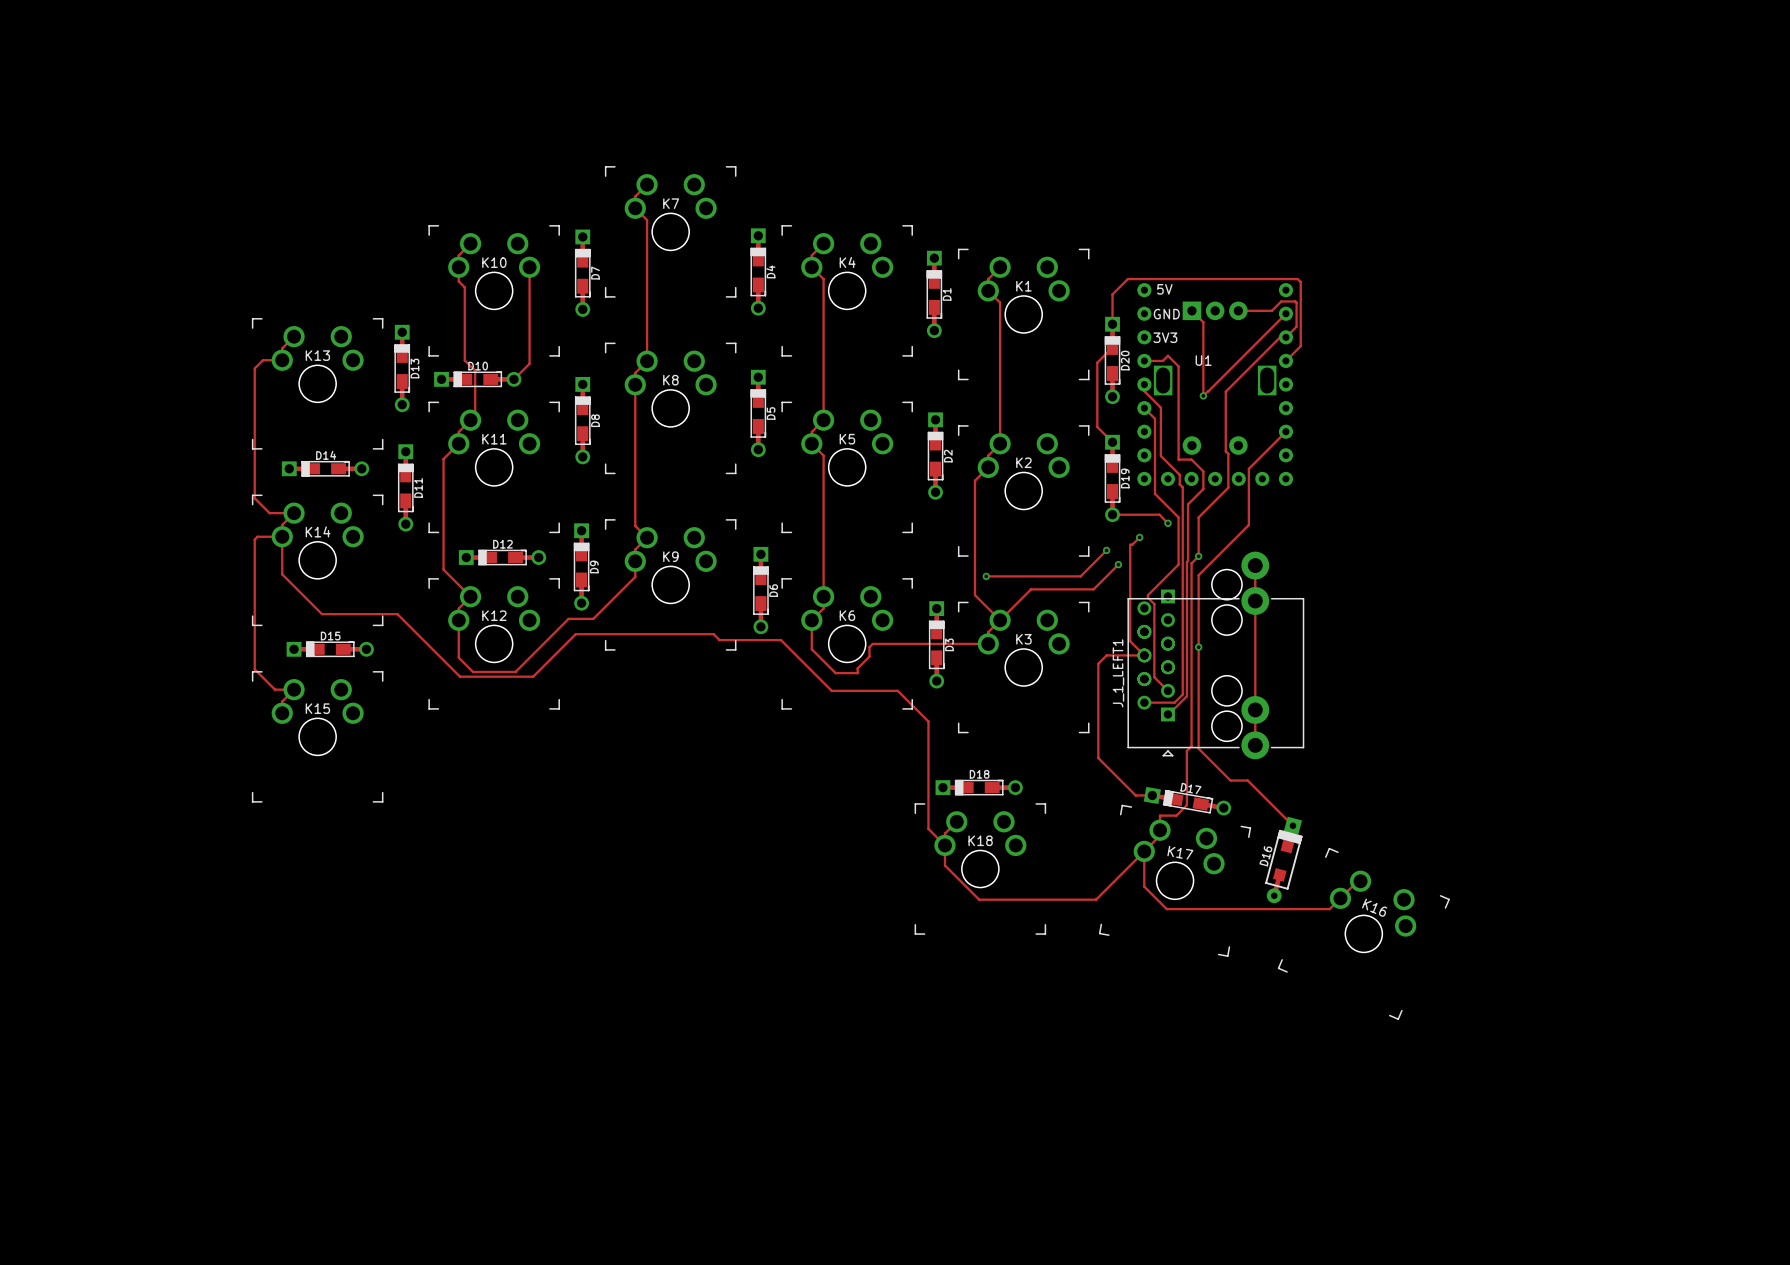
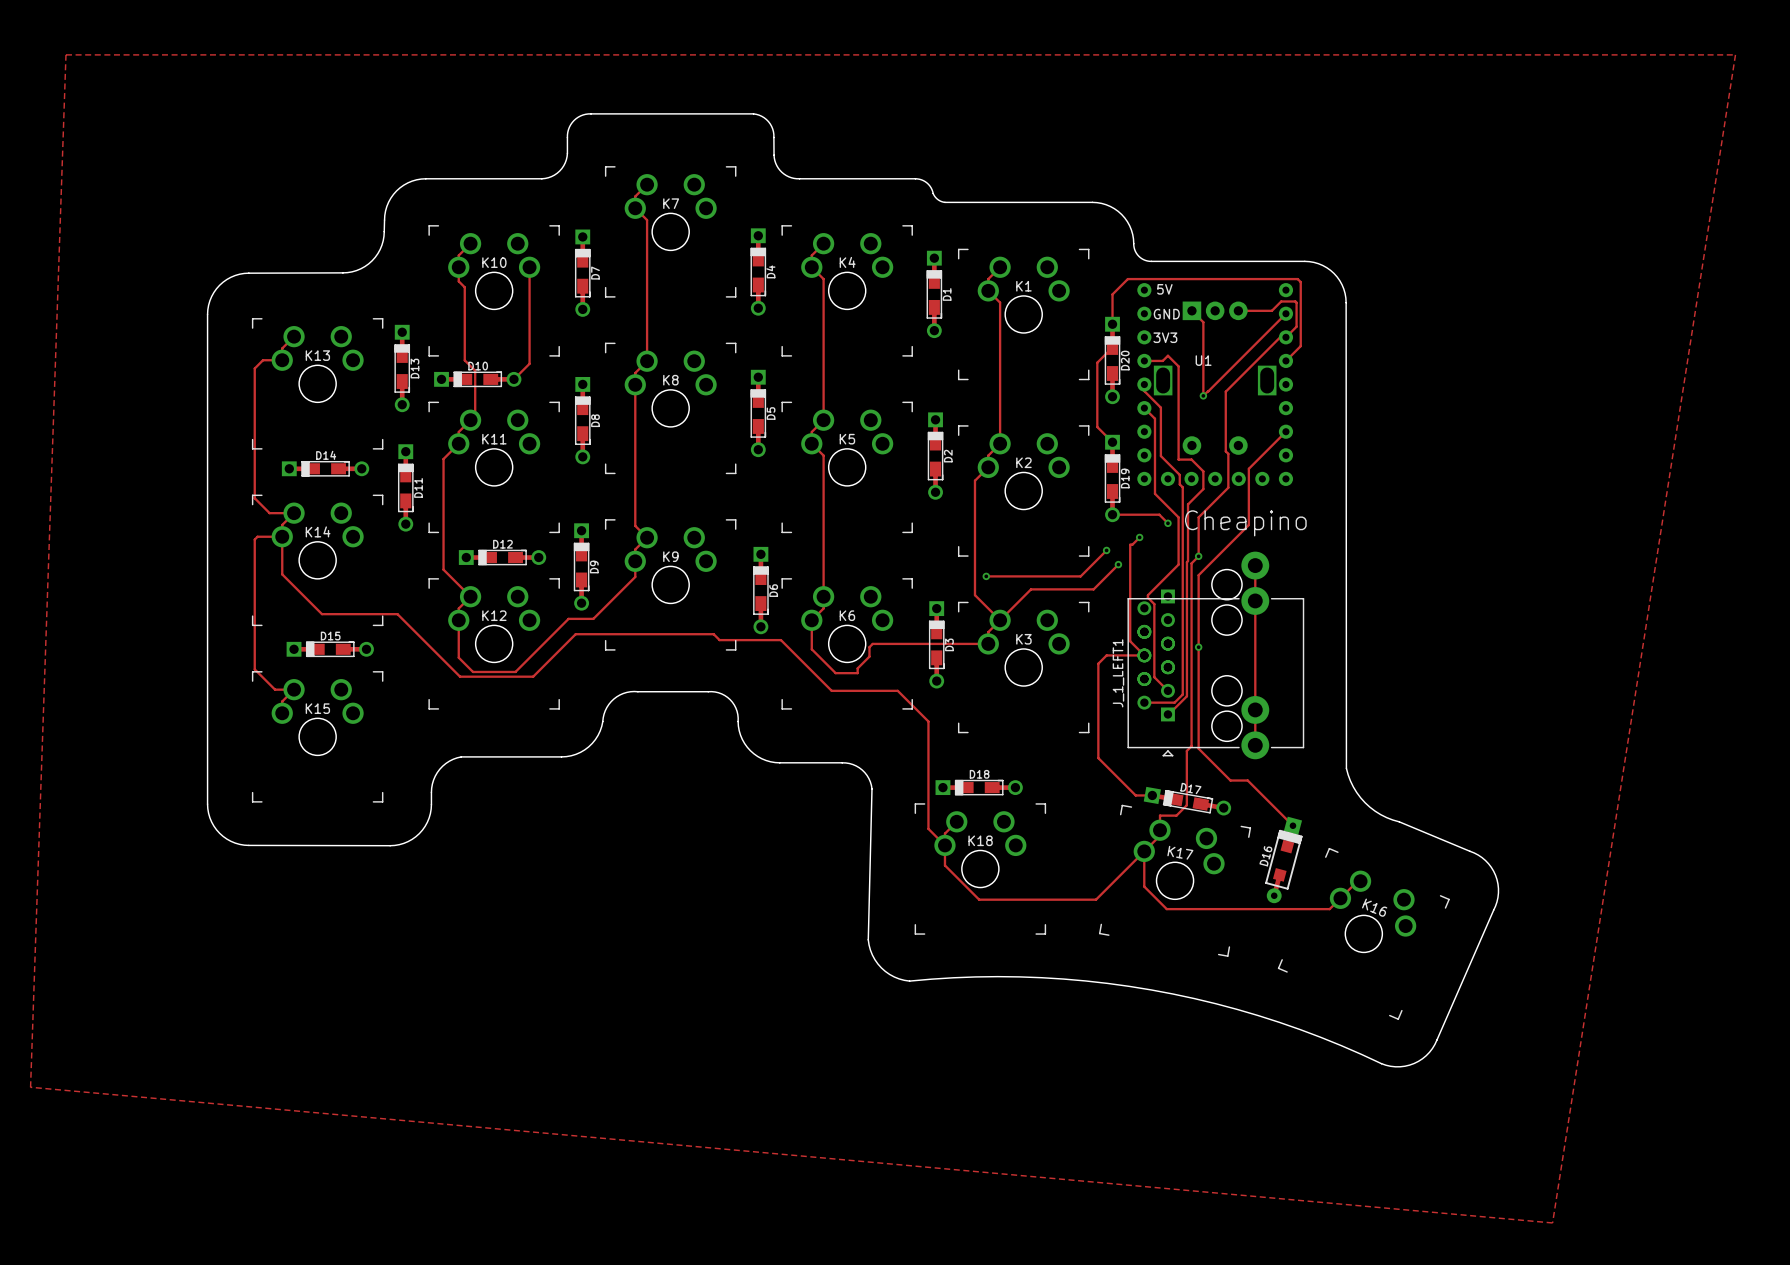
zone outline: none -> (65, 54) (30, 1087) (1552, 1222) (1735, 54) (65, 54)
board edge: none -> (591, 113) (756, 114) (764, 117) (771, 126) (775, 163) (781, 172) (791, 177) (917, 178) (927, 182) (935, 197) (944, 202) (1101, 203) (1114, 208) (1124, 217) (1131, 230) (1135, 251) (1145, 260) (1309, 261) (1326, 267) (1337, 276) (1343, 289) (1346, 302) (1346, 768) (1356, 792) (1369, 807) (1386, 817) (1478, 855) (1491, 867) (1497, 884) (1495, 906) (1434, 1044) (1426, 1055) (1418, 1061) (1405, 1066) (1386, 1065) (1320, 1037) (1258, 1015) (1194, 998) (1129, 986) (1041, 977) (975, 976) (909, 981) (894, 976) (877, 963) (872, 955) (868, 939) (871, 788) (867, 775) (859, 767) (849, 763) (775, 762) (757, 756) (747, 747) (742, 739) (734, 705) (727, 697) (715, 691) (634, 691) (620, 694) (606, 707) (600, 731) (595, 739) (584, 749) (571, 755) (461, 756) (453, 759) (442, 766) (433, 779) (430, 813) (425, 826) (412, 839) (399, 844) (244, 845) (230, 841) (216, 829) (209, 817) (207, 804) (207, 314) (211, 296) (223, 282) (239, 274) (342, 272) (360, 268) (372, 260) (380, 249) (383, 236) (386, 206) (393, 194) (403, 185) (421, 179) (541, 178) (551, 176) (559, 171) (565, 162) (567, 132) (570, 124) (580, 115) (591, 113)
text: none -> Cheapino (1245, 523)

